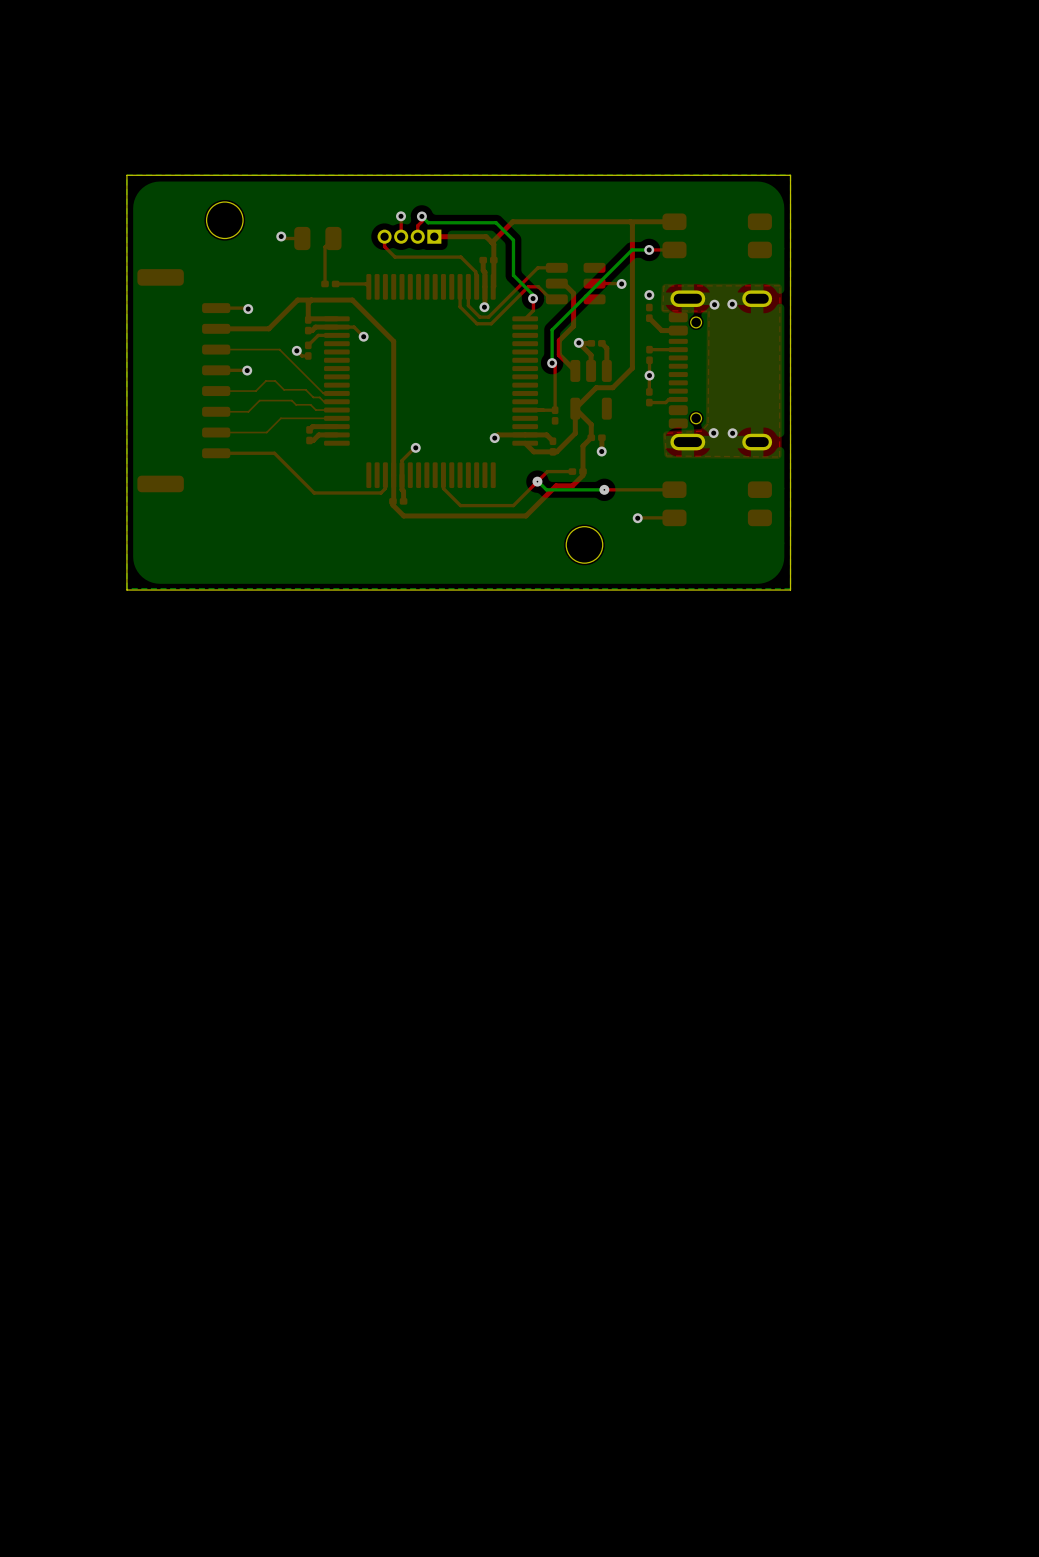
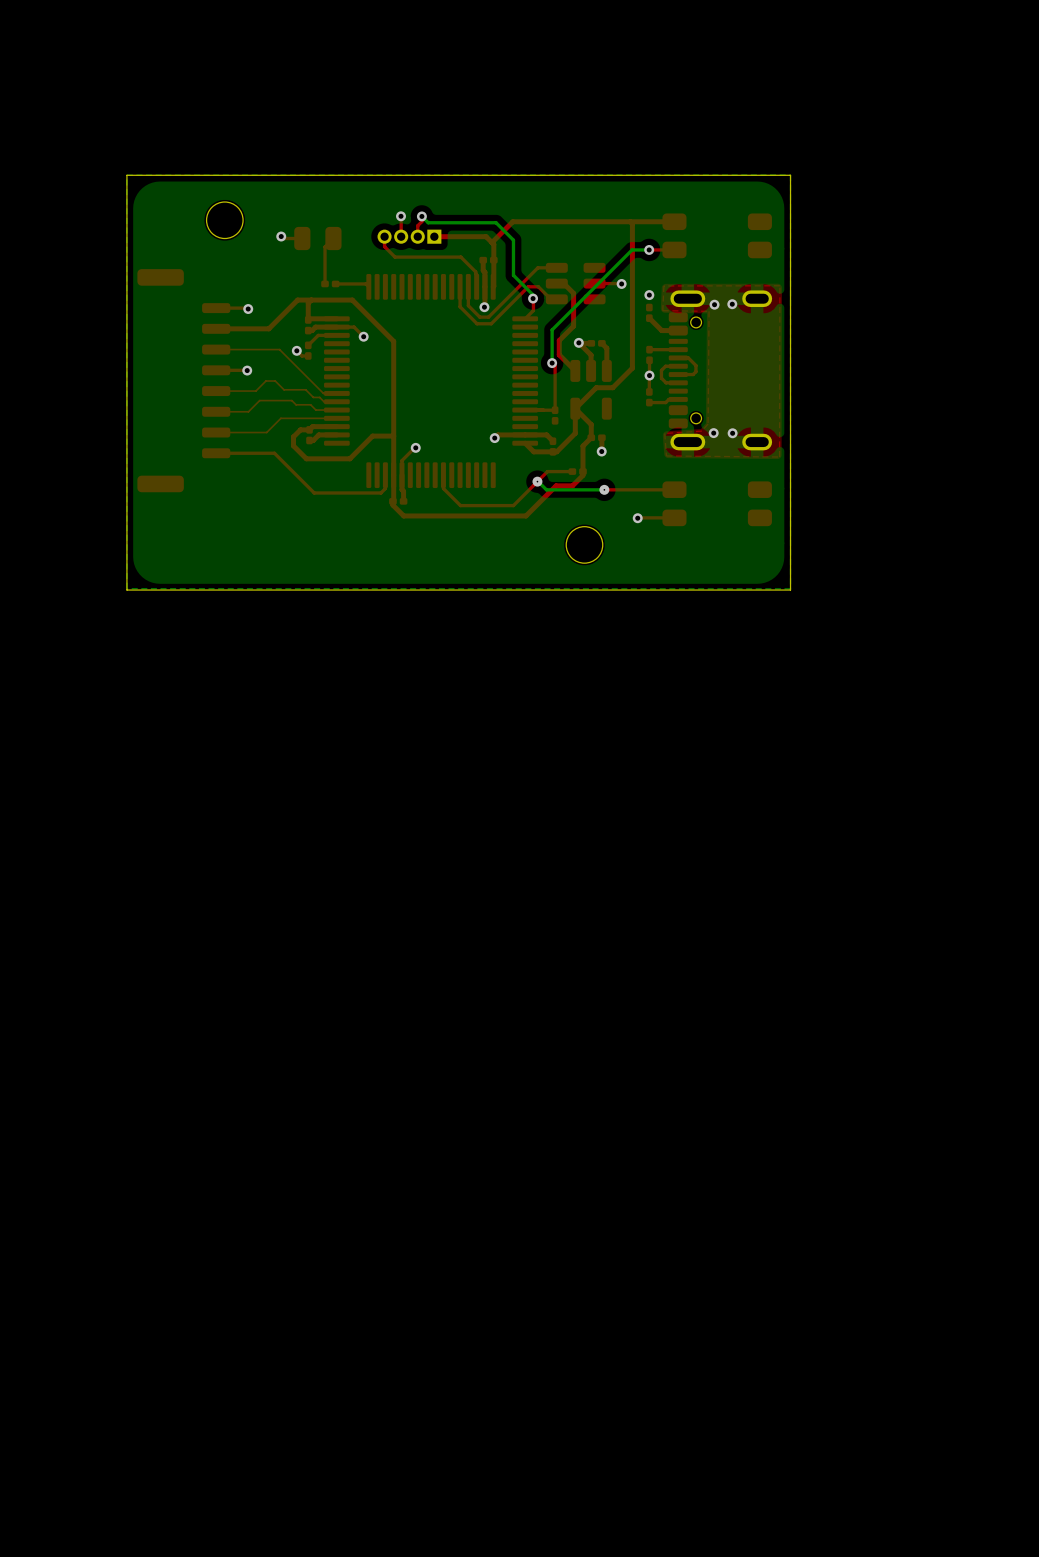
top track: none -> (678, 357) (688, 357) (695, 365) (695, 371) (693, 374) (678, 374)
top track: none -> (678, 366) (665, 366) (661, 370) (661, 378) (666, 382) (678, 382)
top track: none -> (309, 429) (300, 429) (293, 436) (293, 445) (306, 458) (349, 458) (372, 436) (393, 436)

